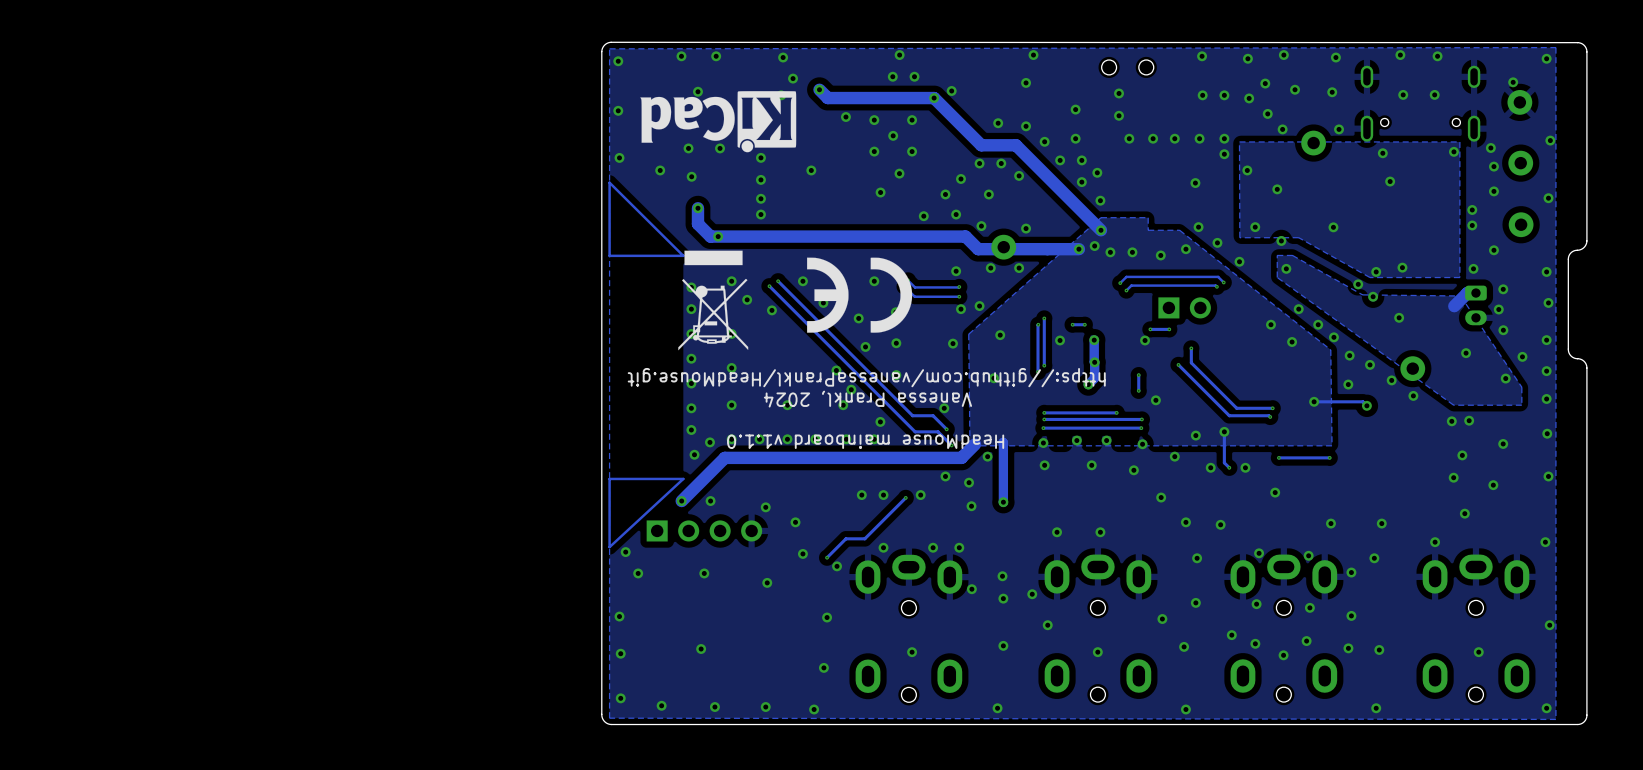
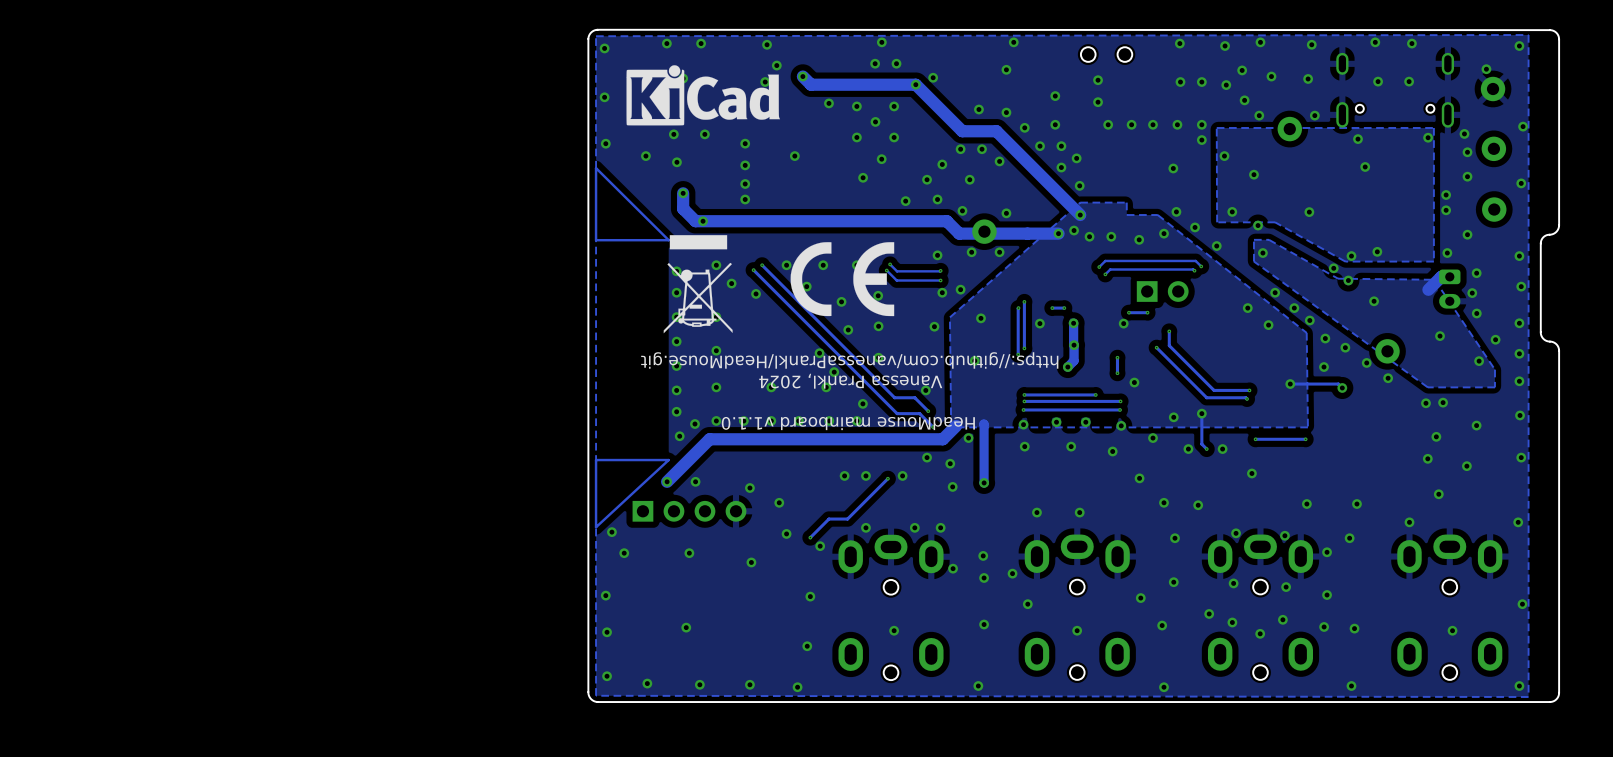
drawing: none -> [626, 65, 781, 126]
drawing: [640, 91, 797, 153] -> none
drawing shape: [807, 257, 913, 333] -> [790, 242, 895, 317]

